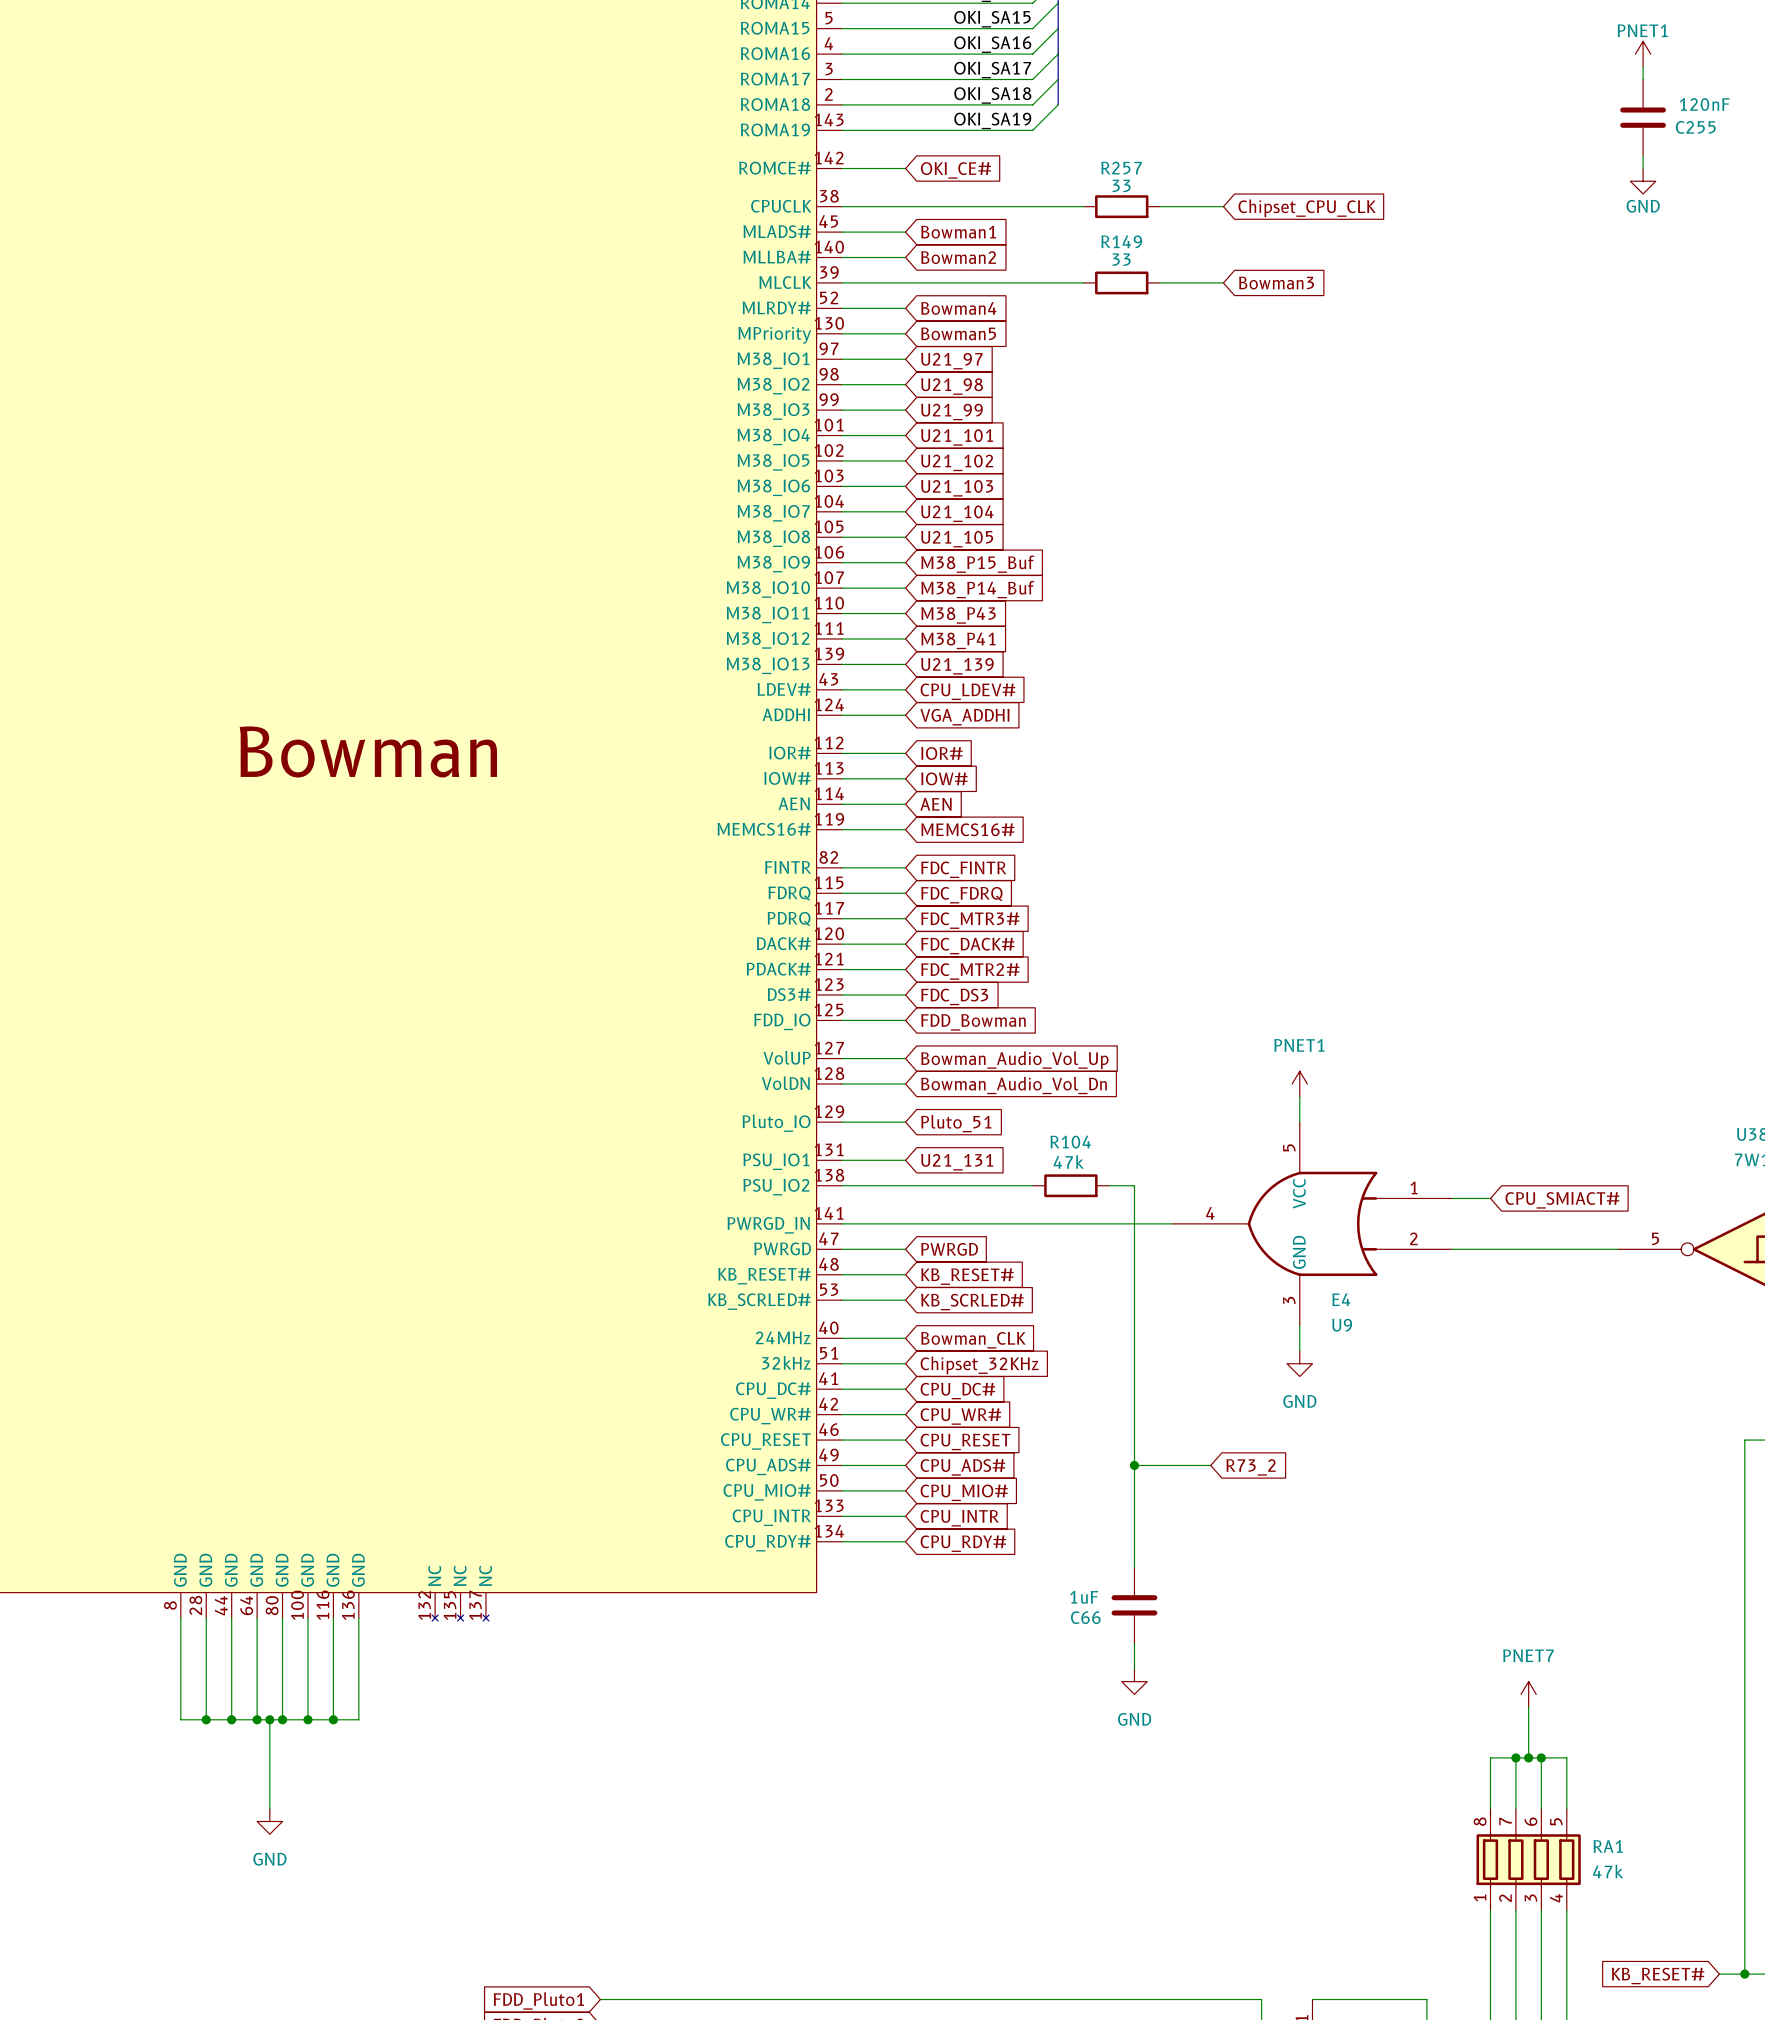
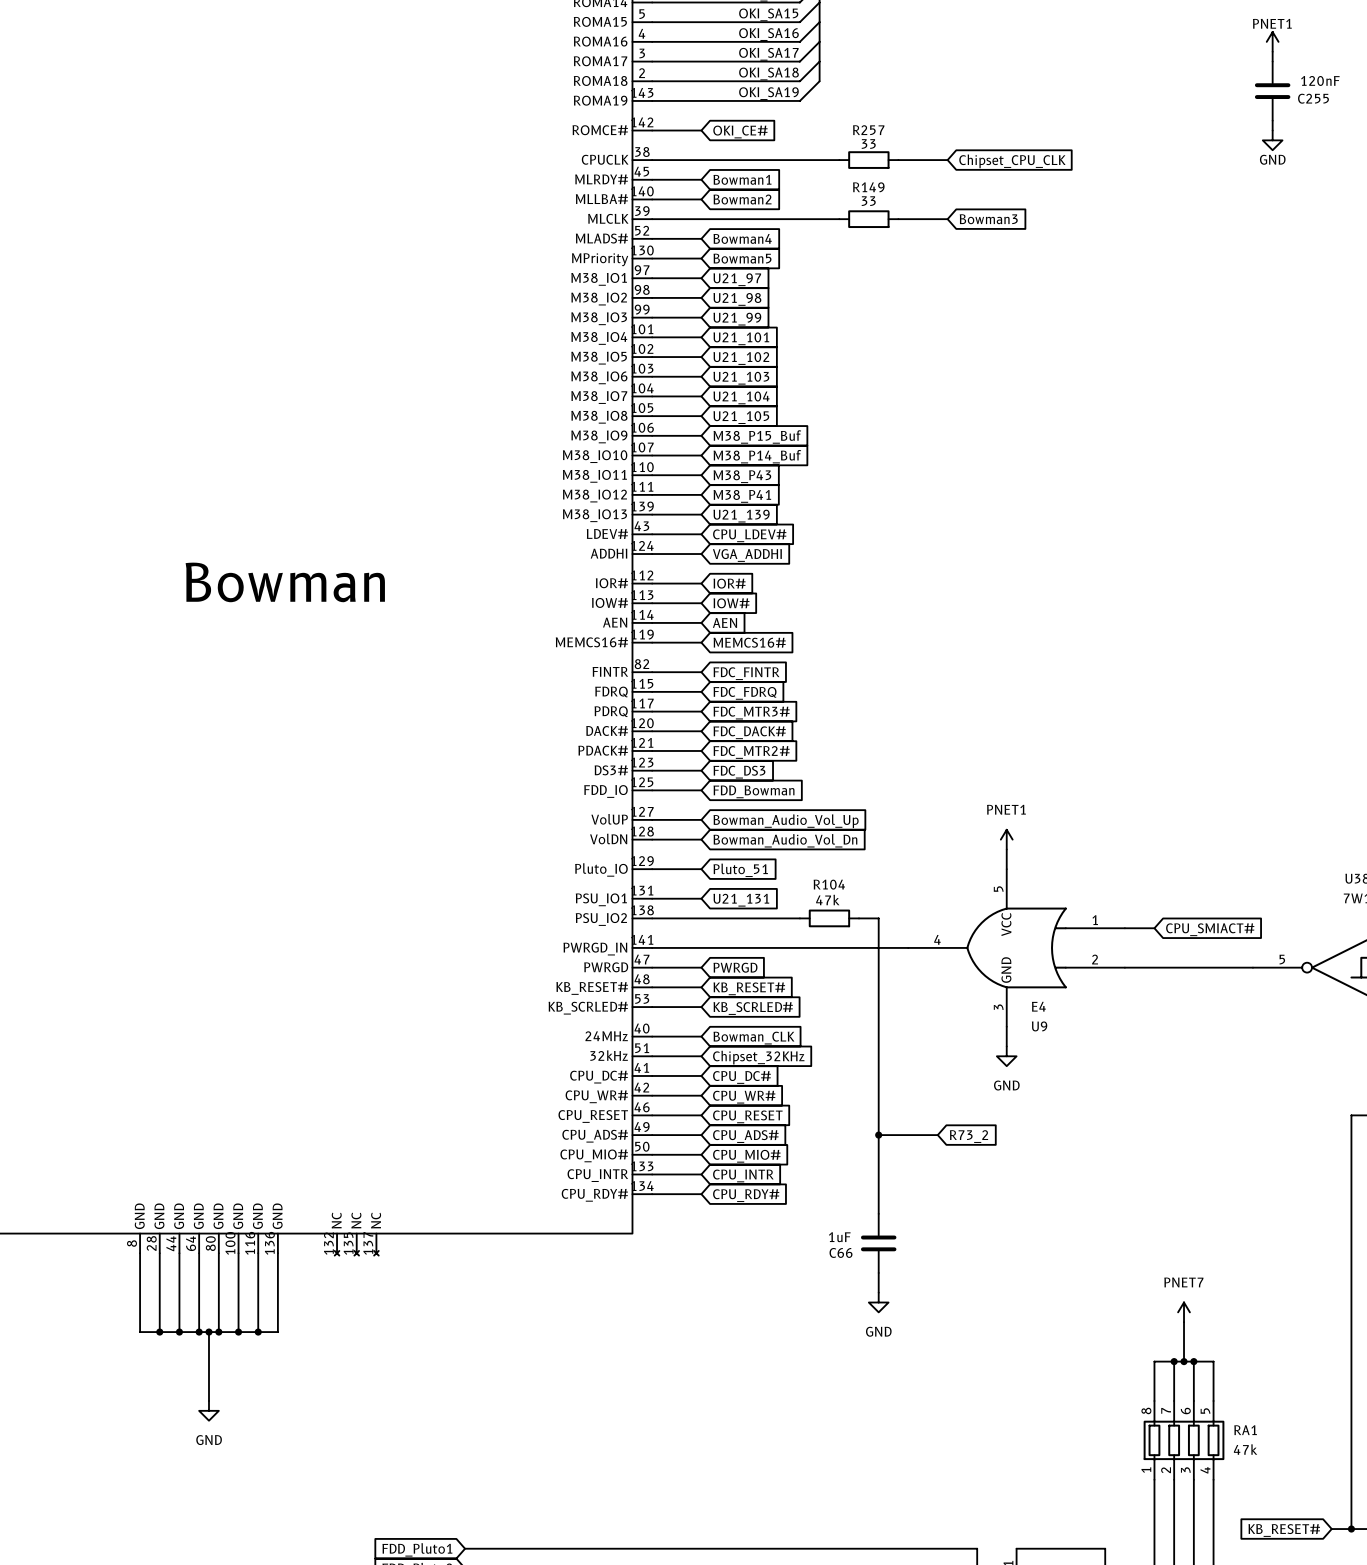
part pin name: MLADS# (777, 231) -> MLRDY# (601, 179)
part pin name: MLRDY# (776, 307) -> MLADS# (601, 238)

